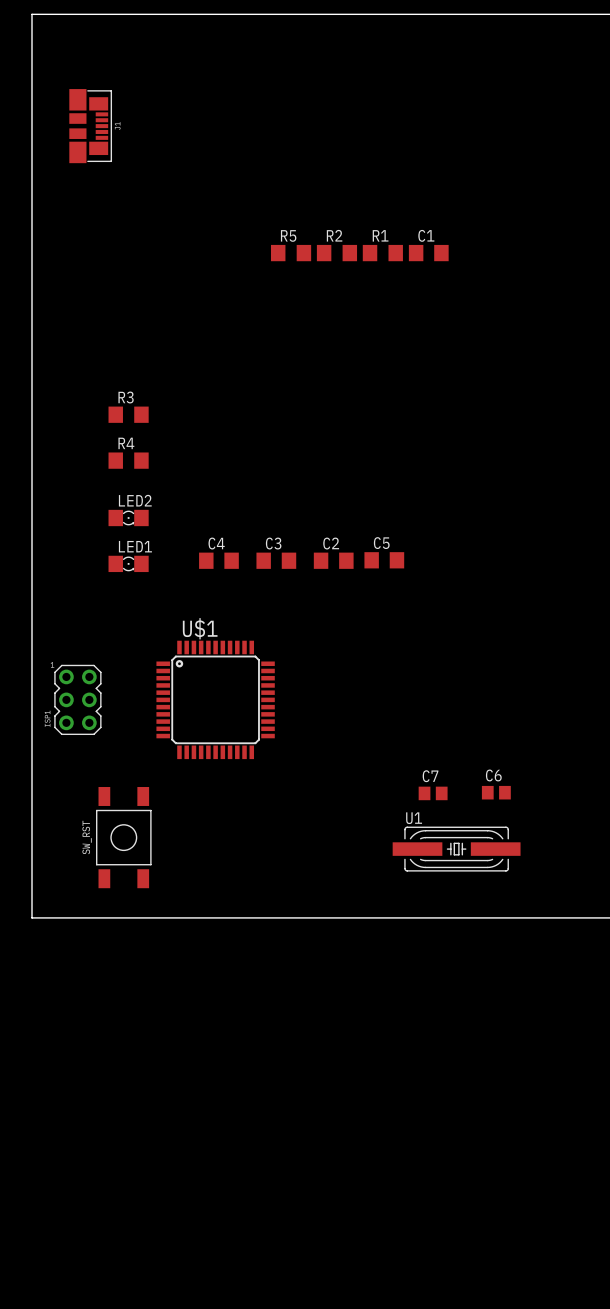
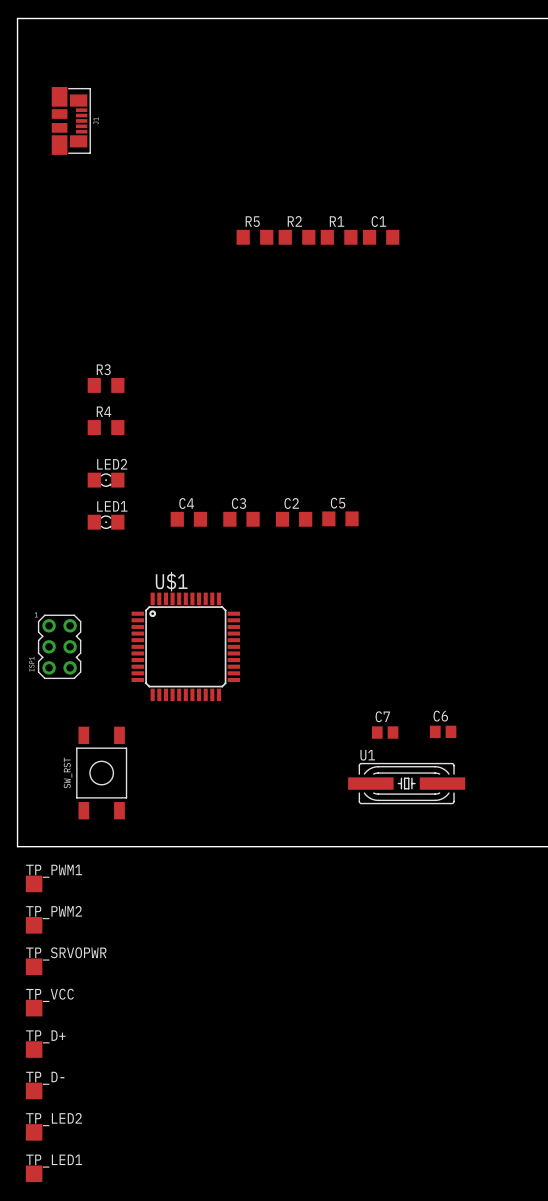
TP_PWM1: none -> (34, 883)
TP_PWM2: none -> (34, 925)
TP_SRVOPWR: none -> (34, 966)
TP_VCC: none -> (34, 1008)
TP_D+: none -> (34, 1049)
TP_D-: none -> (34, 1090)
TP_LED2: none -> (34, 1132)
TP_LED1: none -> (34, 1173)

